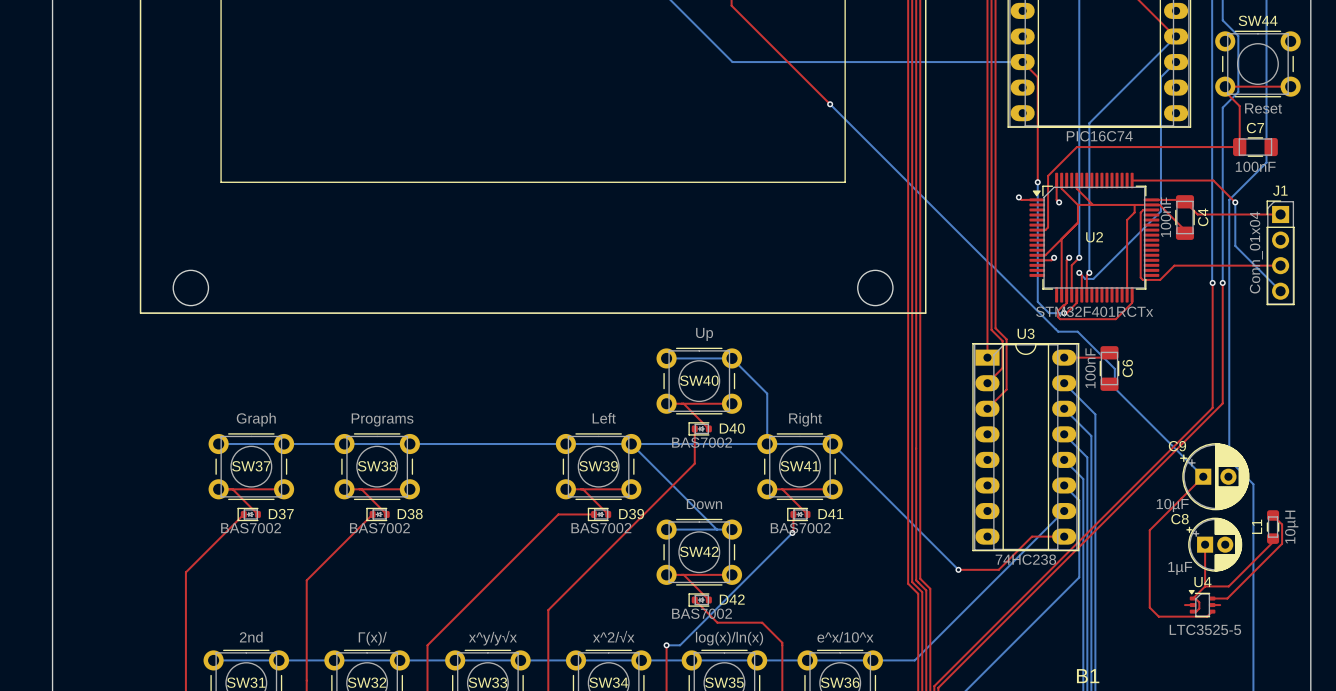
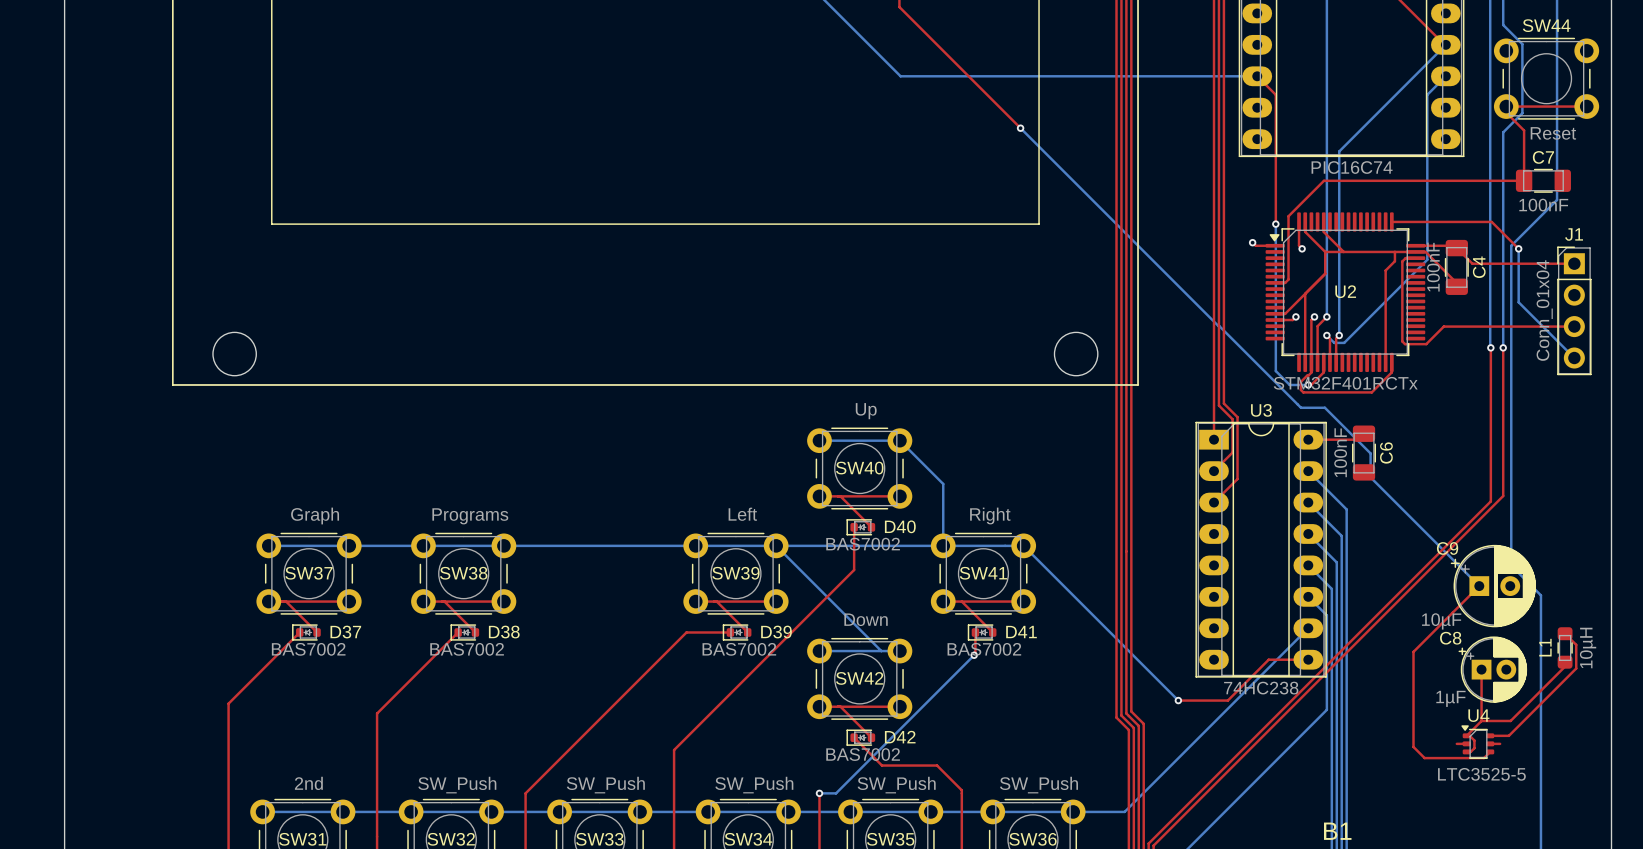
SW34 value: x^2/√x (613, 636) -> SW_Push (754, 785)
SW36 value: e^x/10^x (845, 637) -> SW_Push (1038, 785)
SW32 value: Γ(x)/ (372, 638) -> SW_Push (457, 785)
SW33 value: x^y/y√x (492, 638) -> SW_Push (605, 785)
SW35 value: log(x)/ln(x) (729, 638) -> SW_Push (896, 785)

